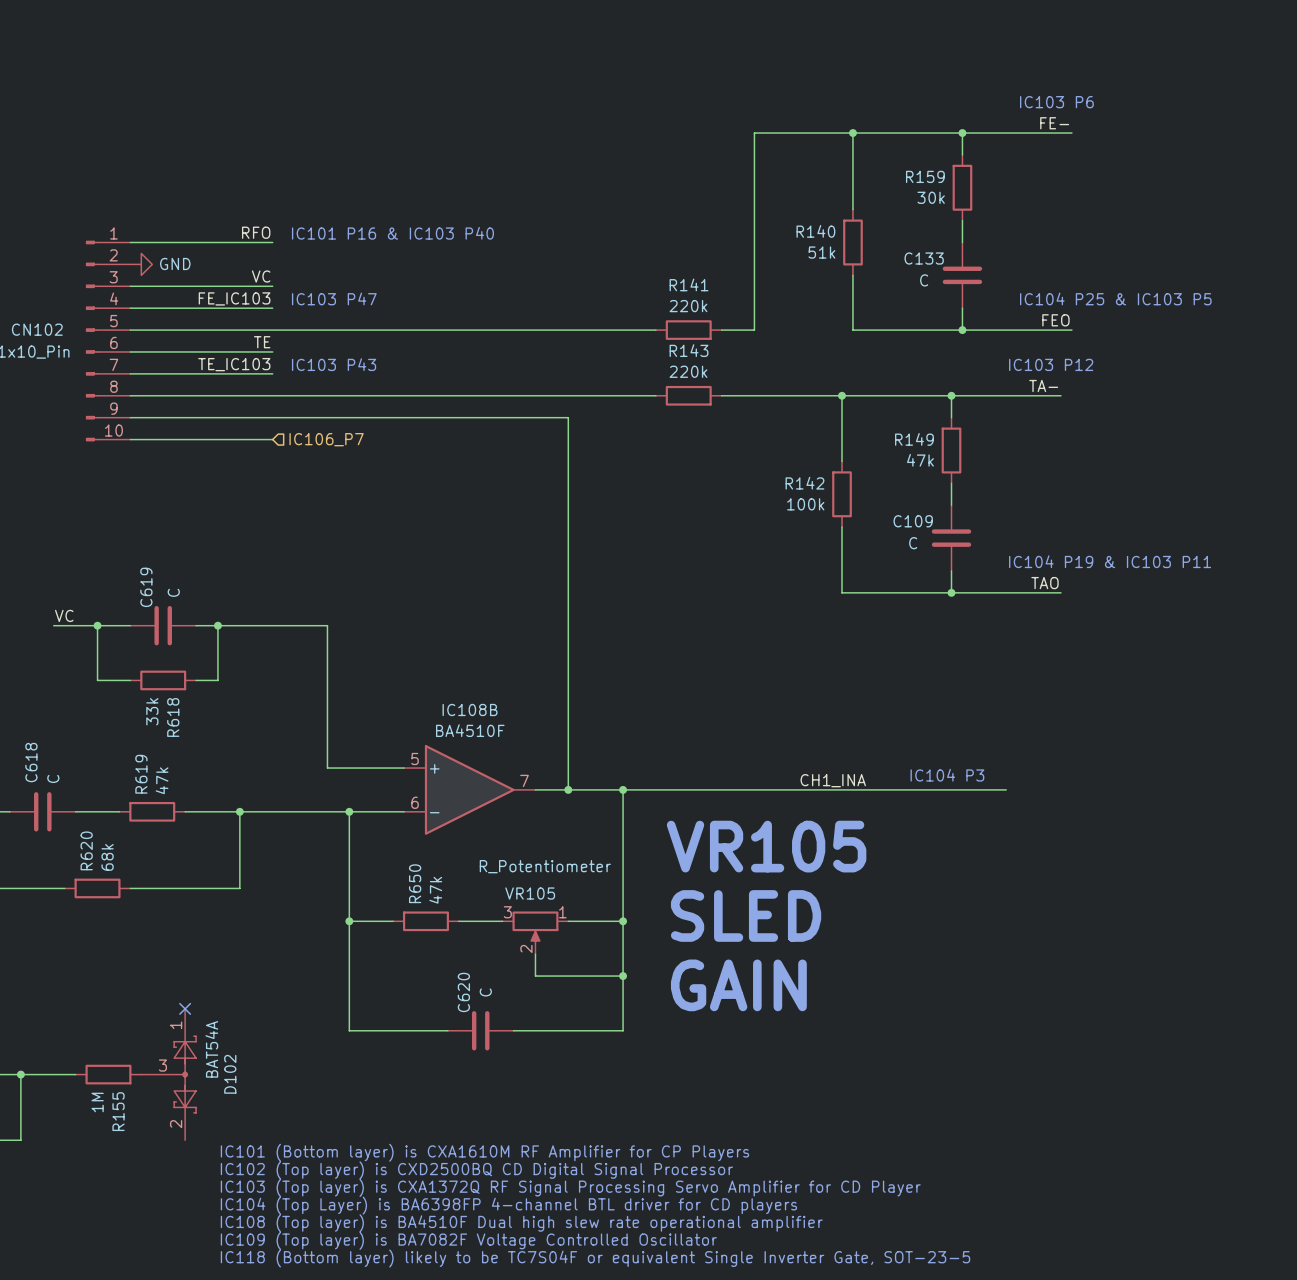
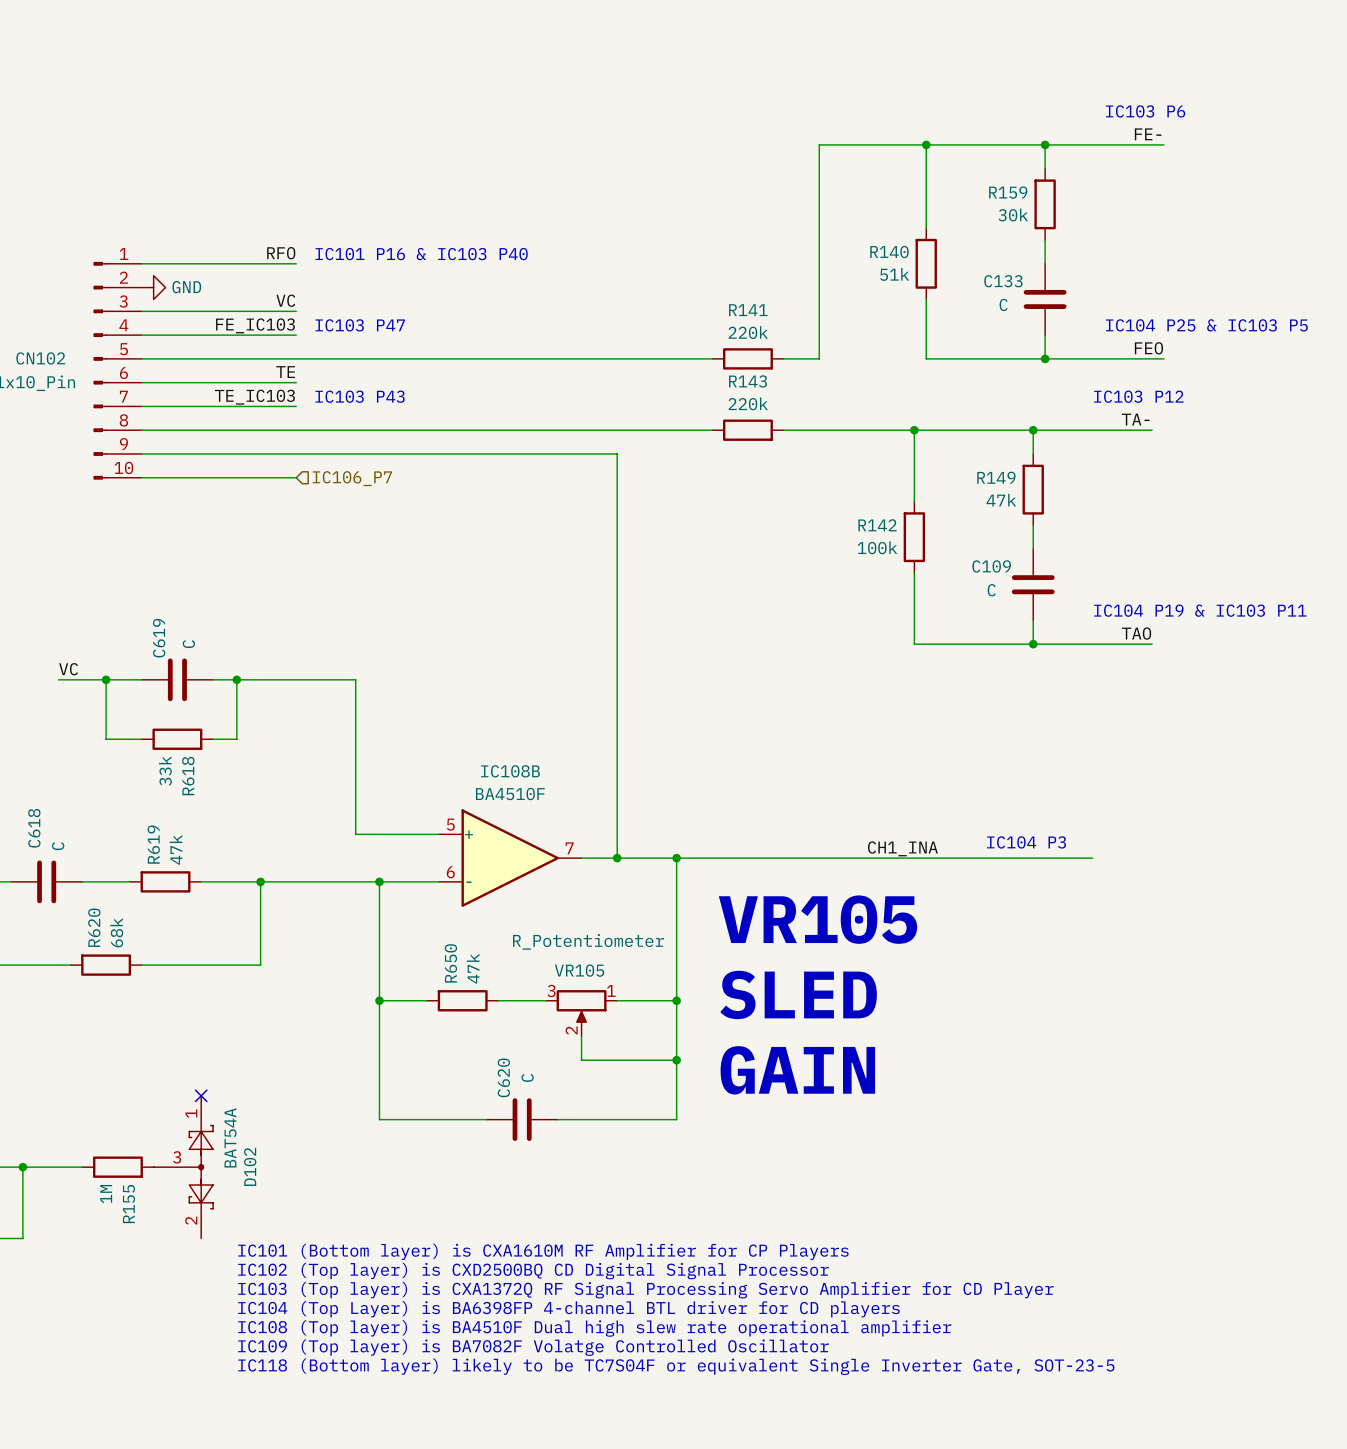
text: IC109 (Top layer) is BA7082F Voltage Controlled Oscillator (468, 1240) -> IC109 (Top layer) is BA7082F Volatge Controlled Oscillator (533, 1347)

